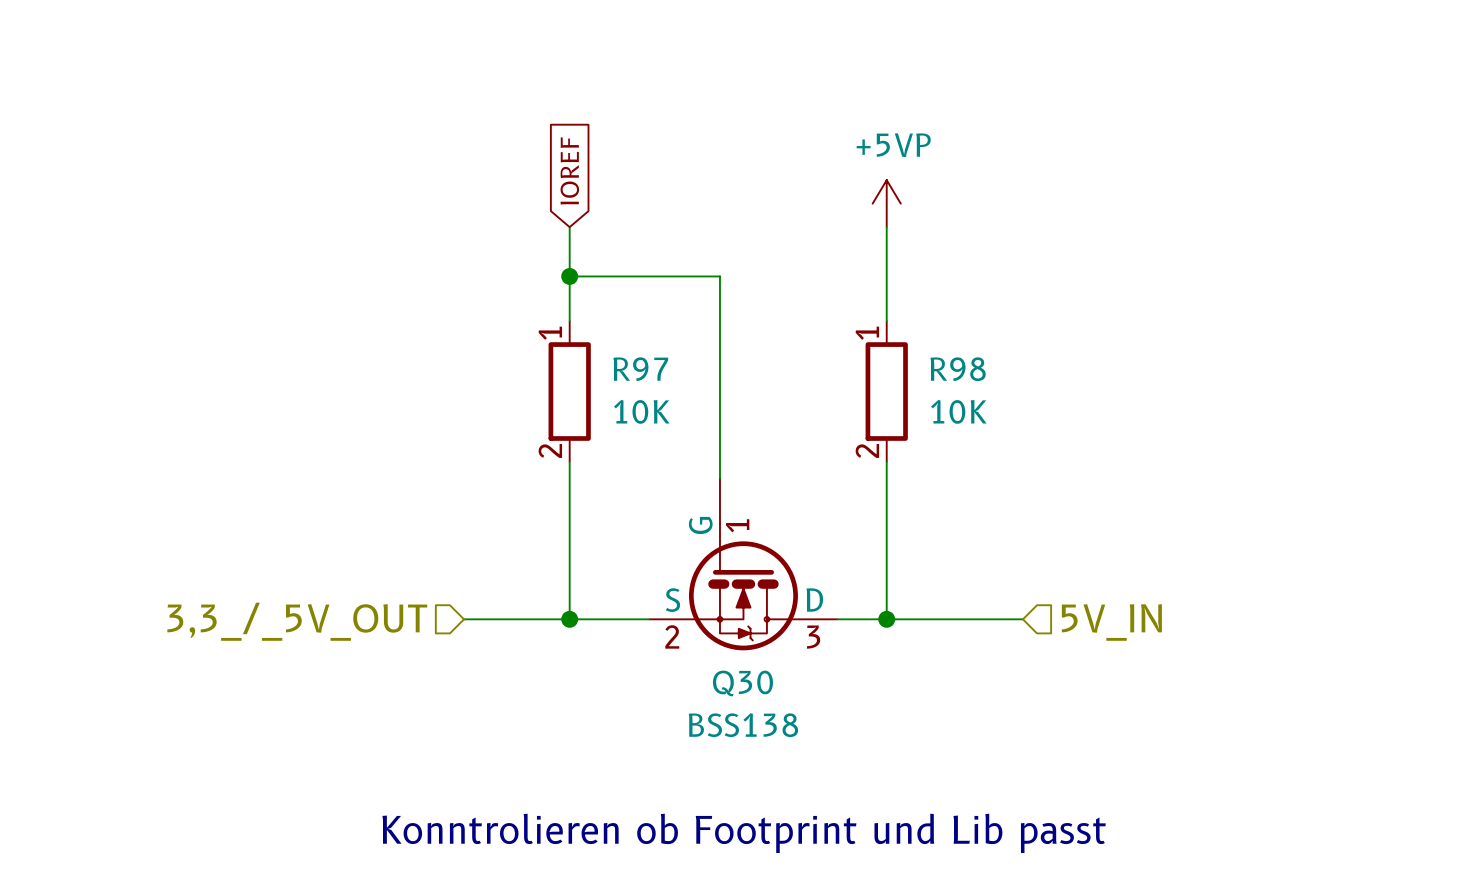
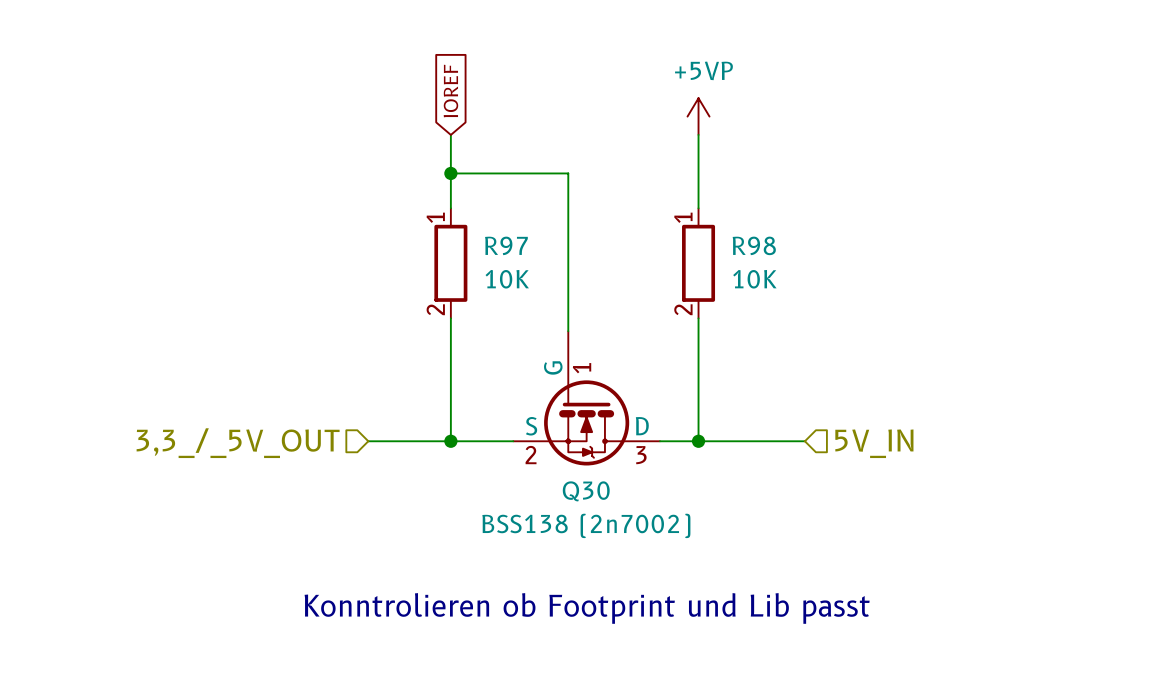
Q30 value: BSS138 (743, 725) -> BSS138 (2n7002) (586, 525)

